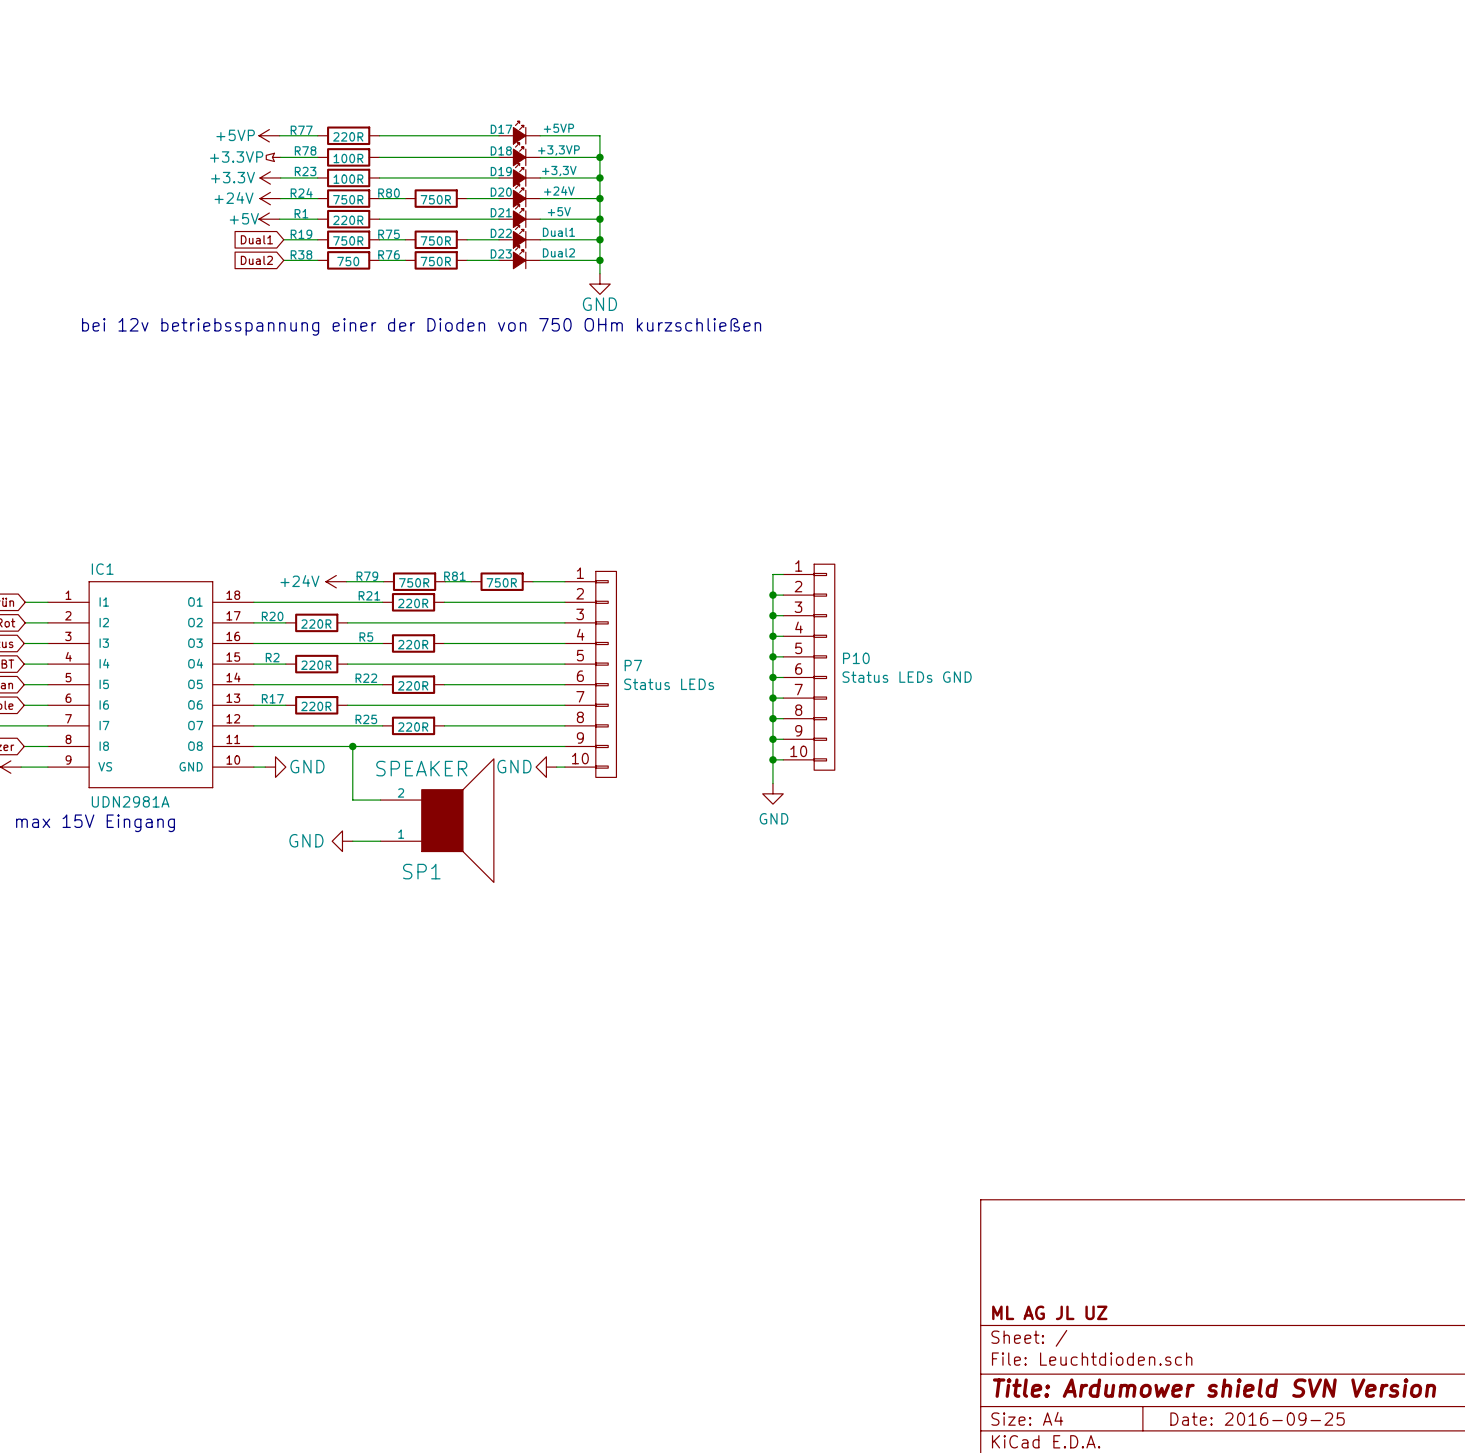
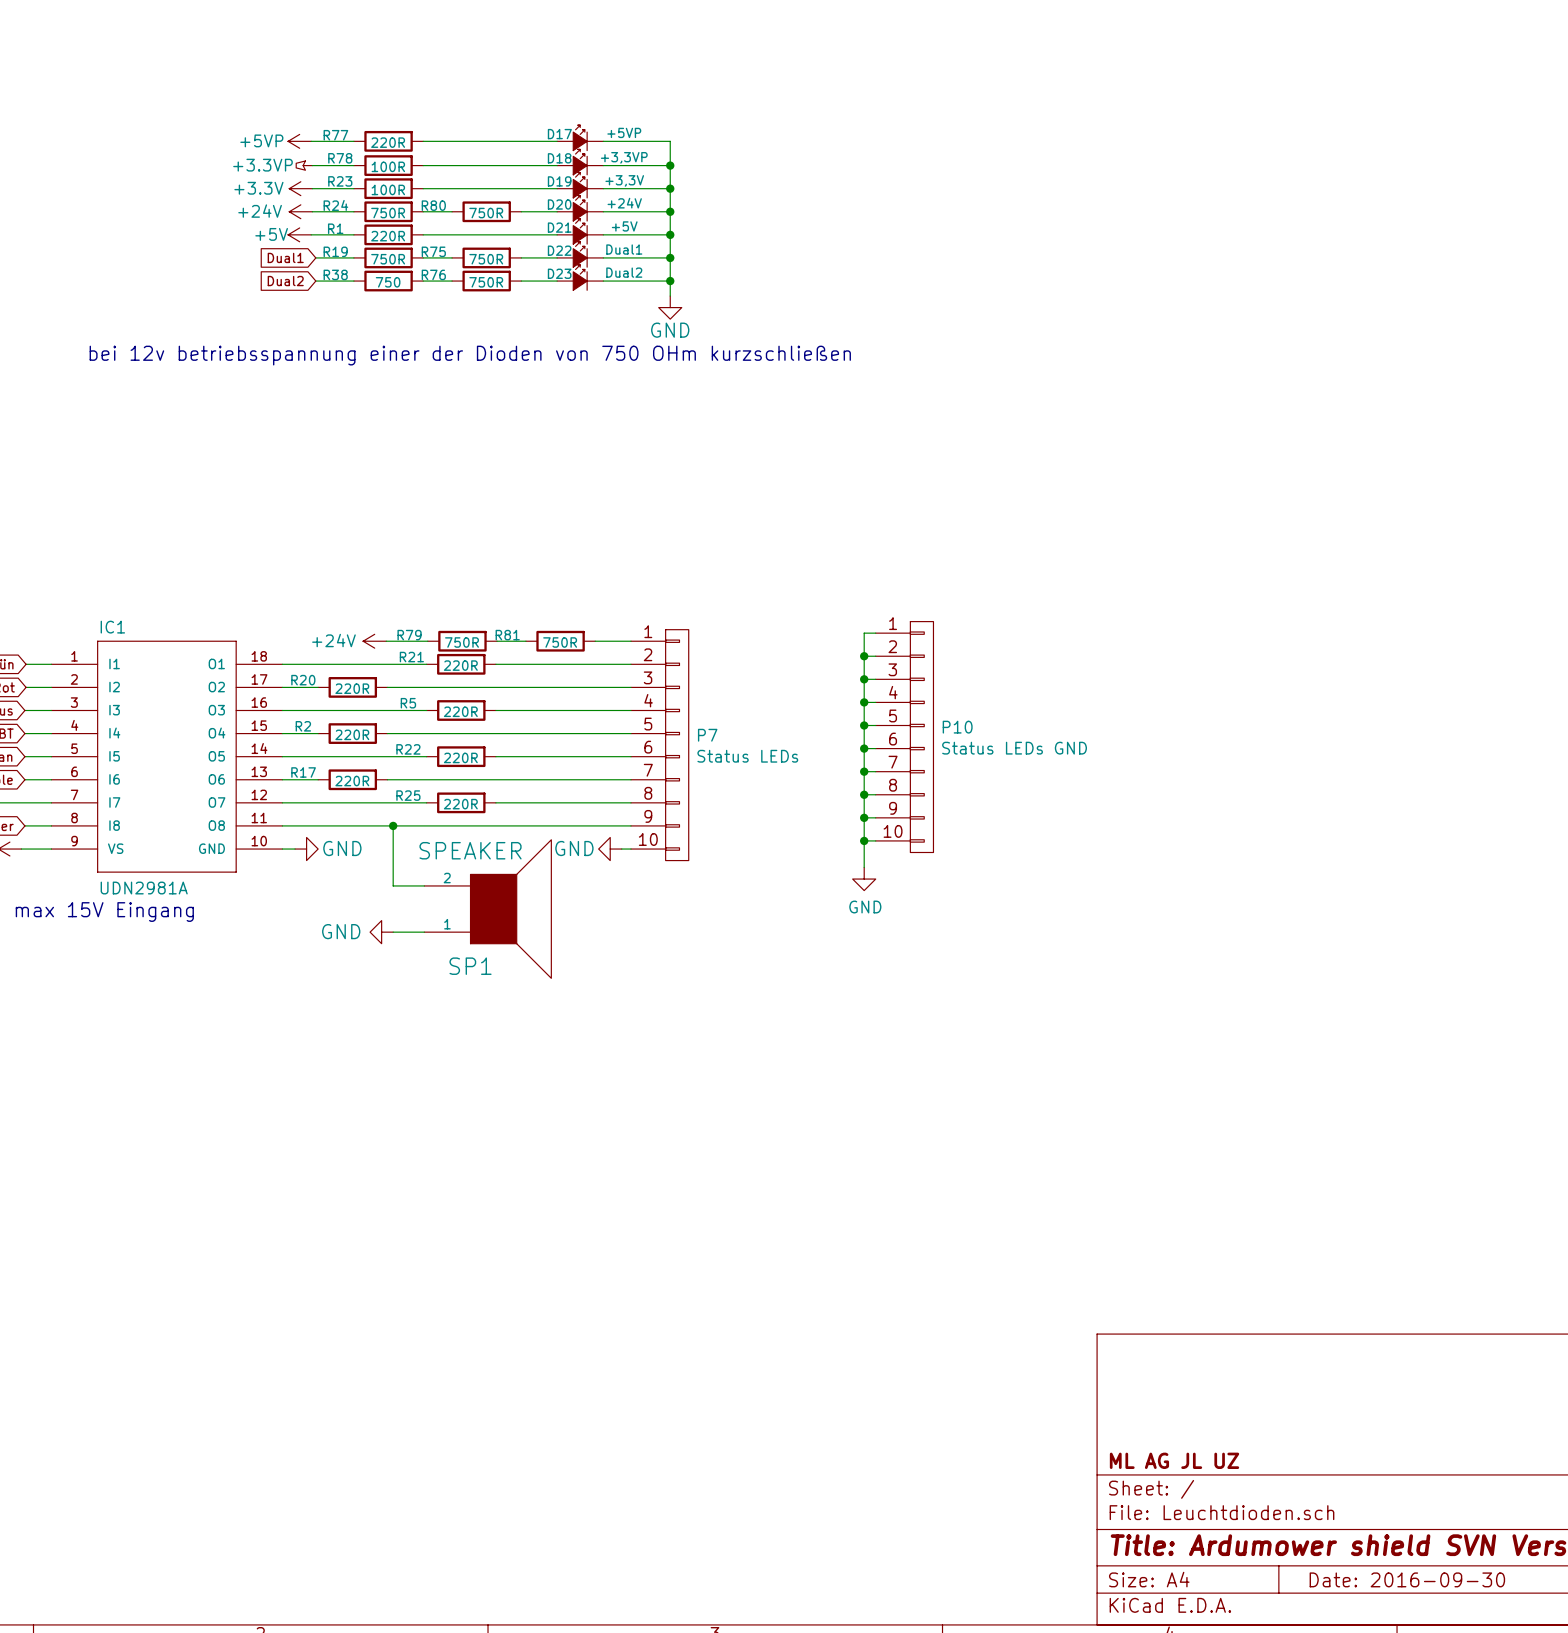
title block: Date: 2016-09-25 (1257, 1419) -> Date: 2016-09-30 (1407, 1579)

